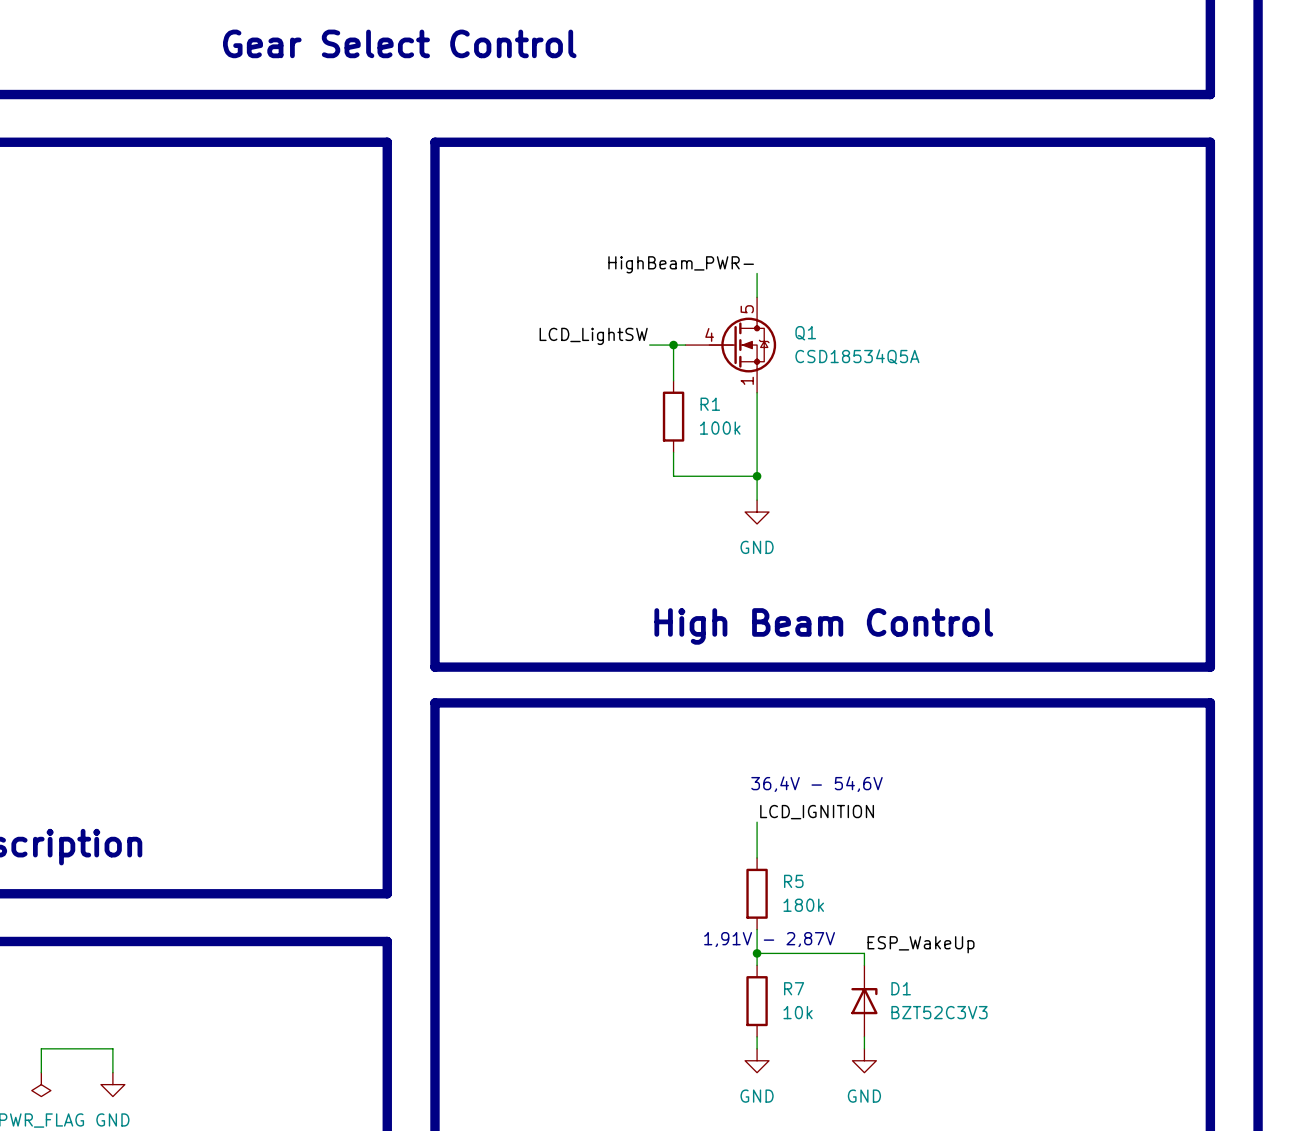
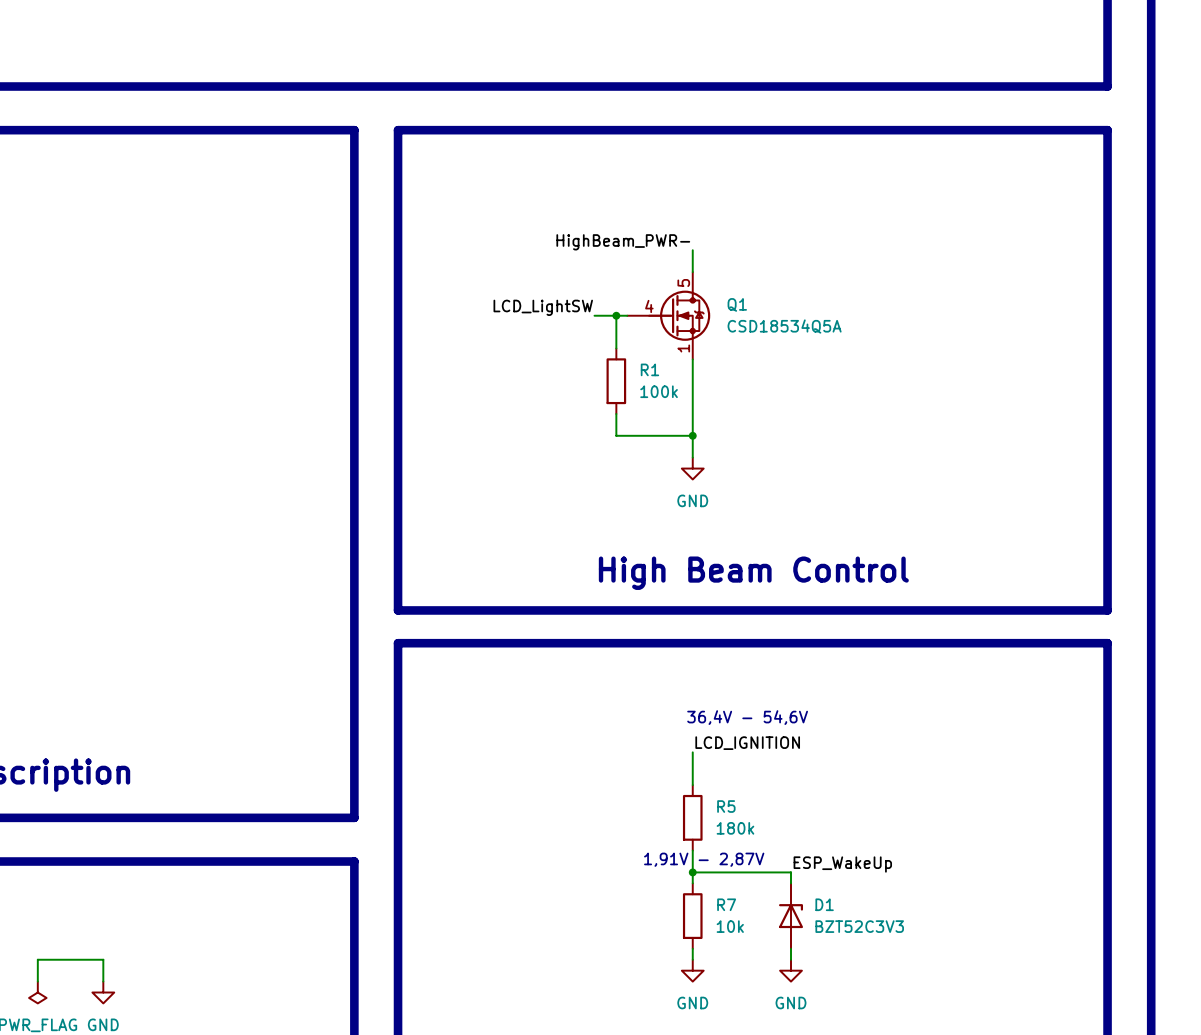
text: Gear Select Control (399, 43) -> none

